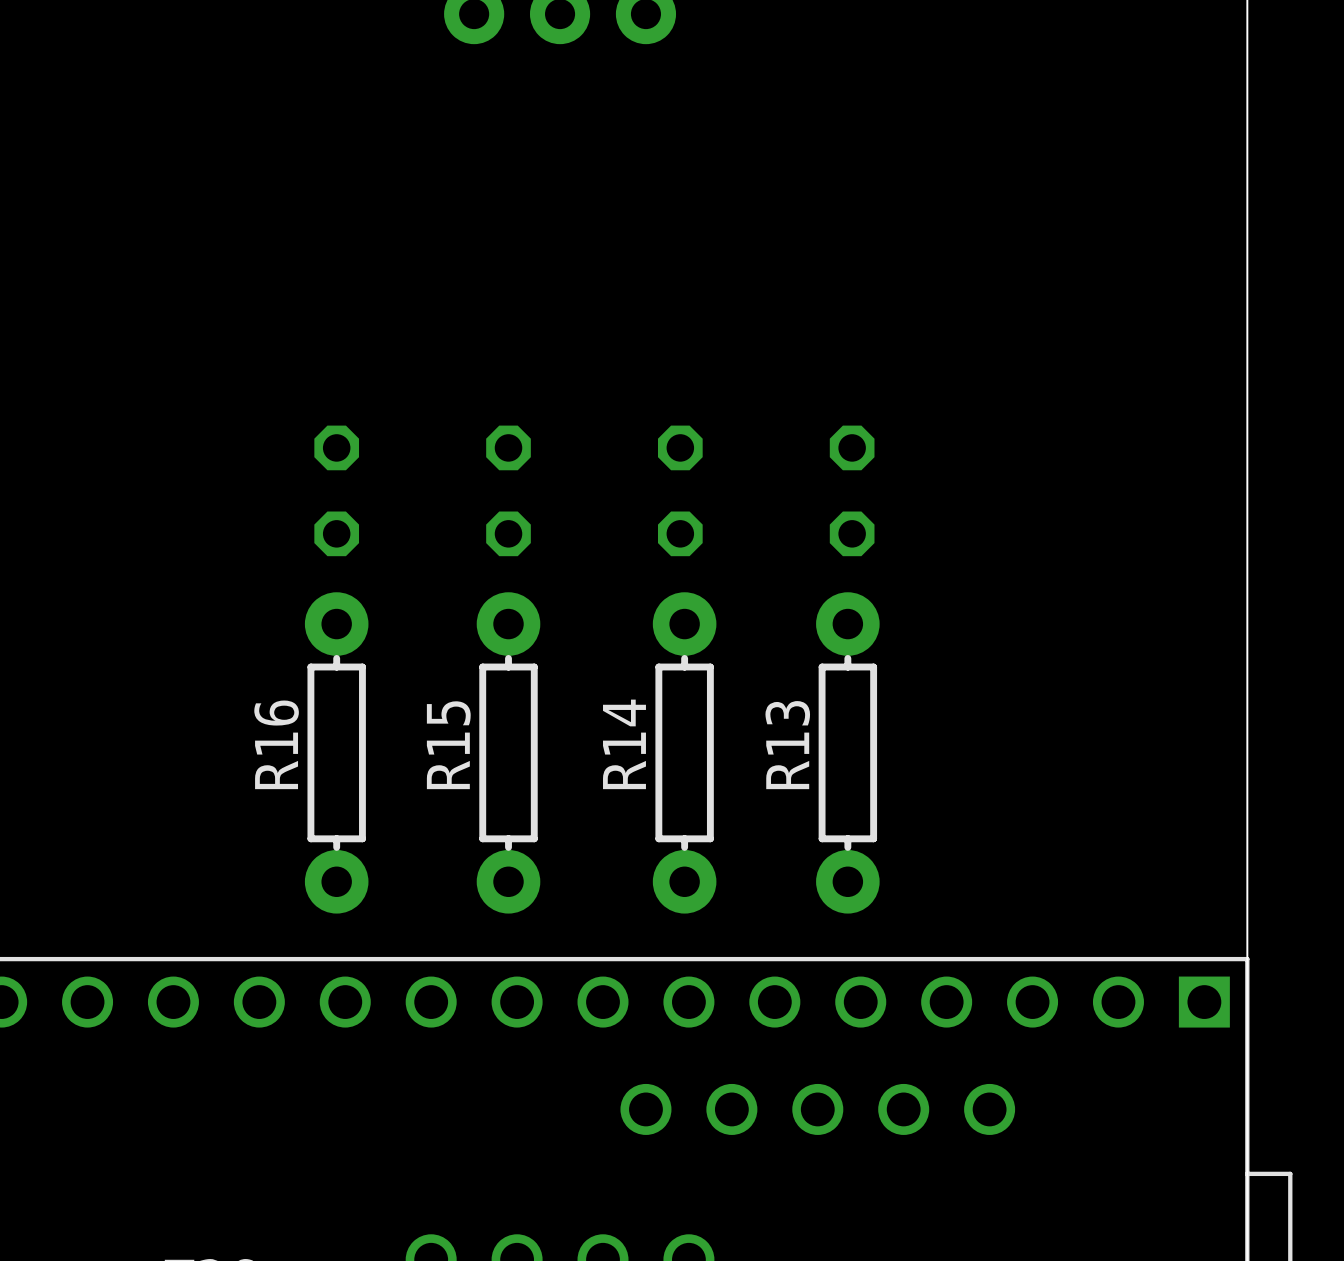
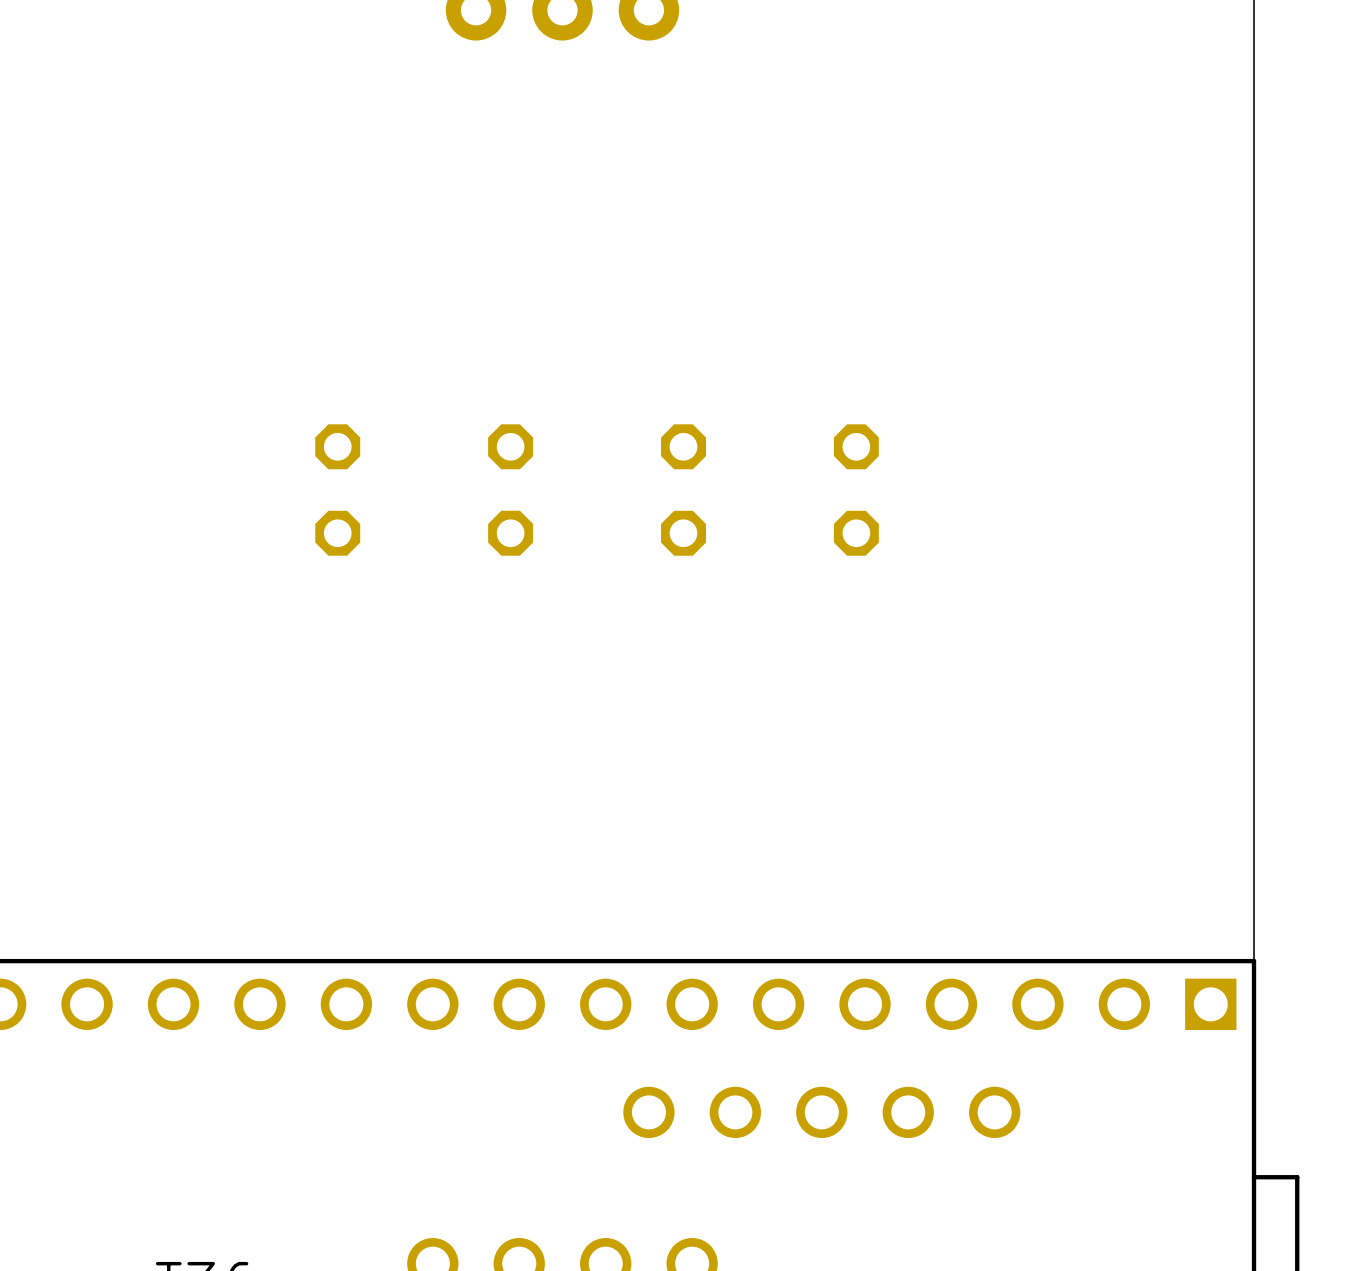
R16: (336, 752) -> none
R15: (508, 752) -> none
R14: (684, 752) -> none
R13: (847, 752) -> none

